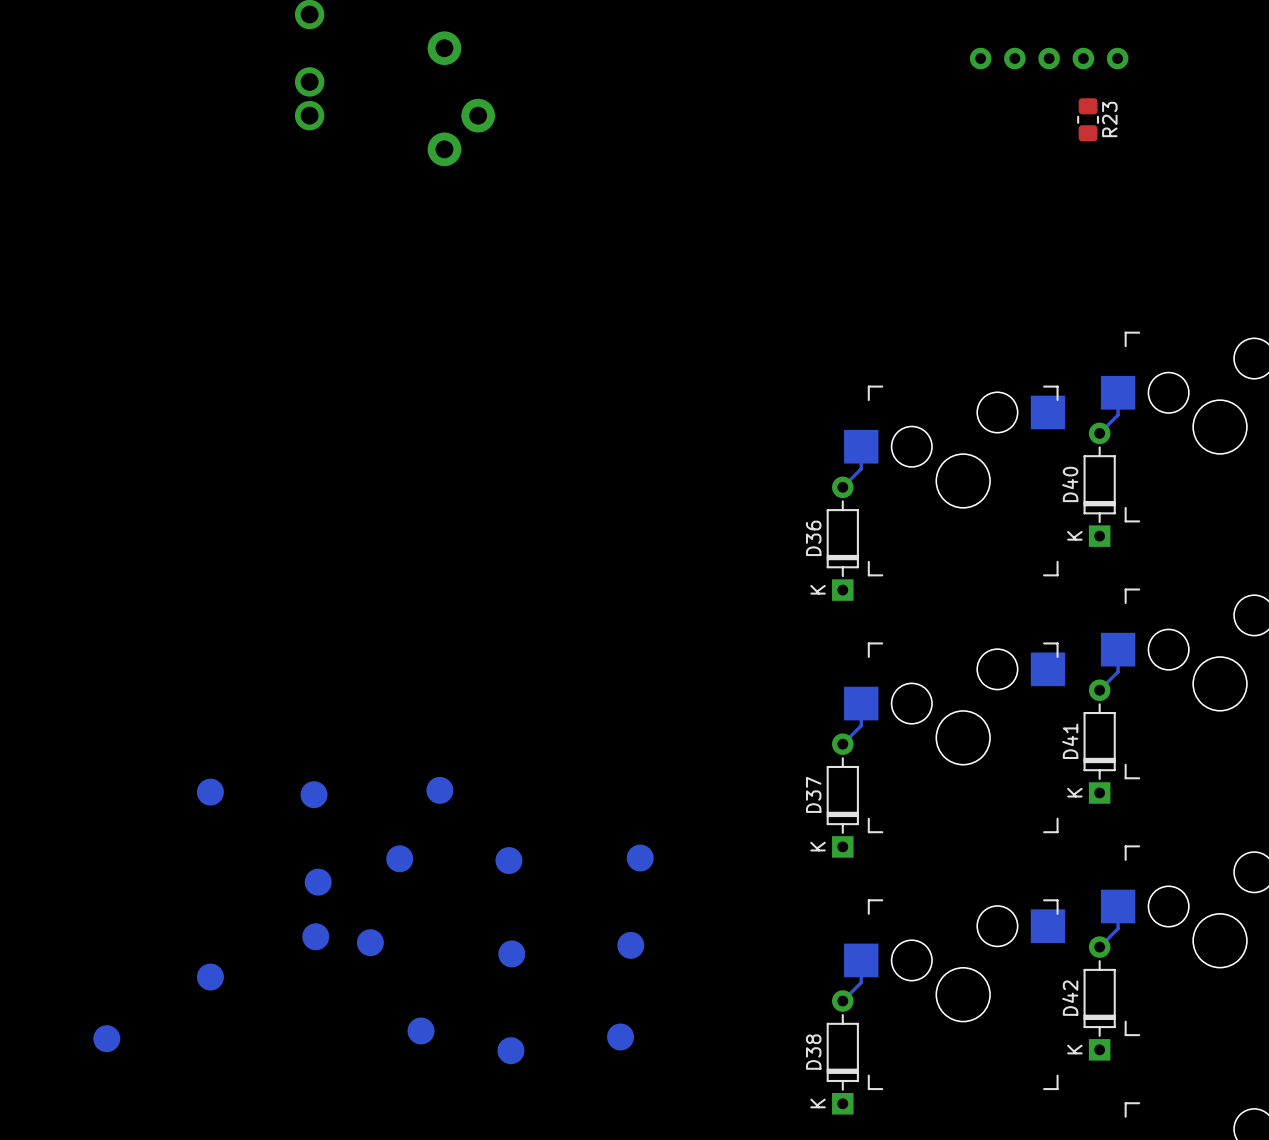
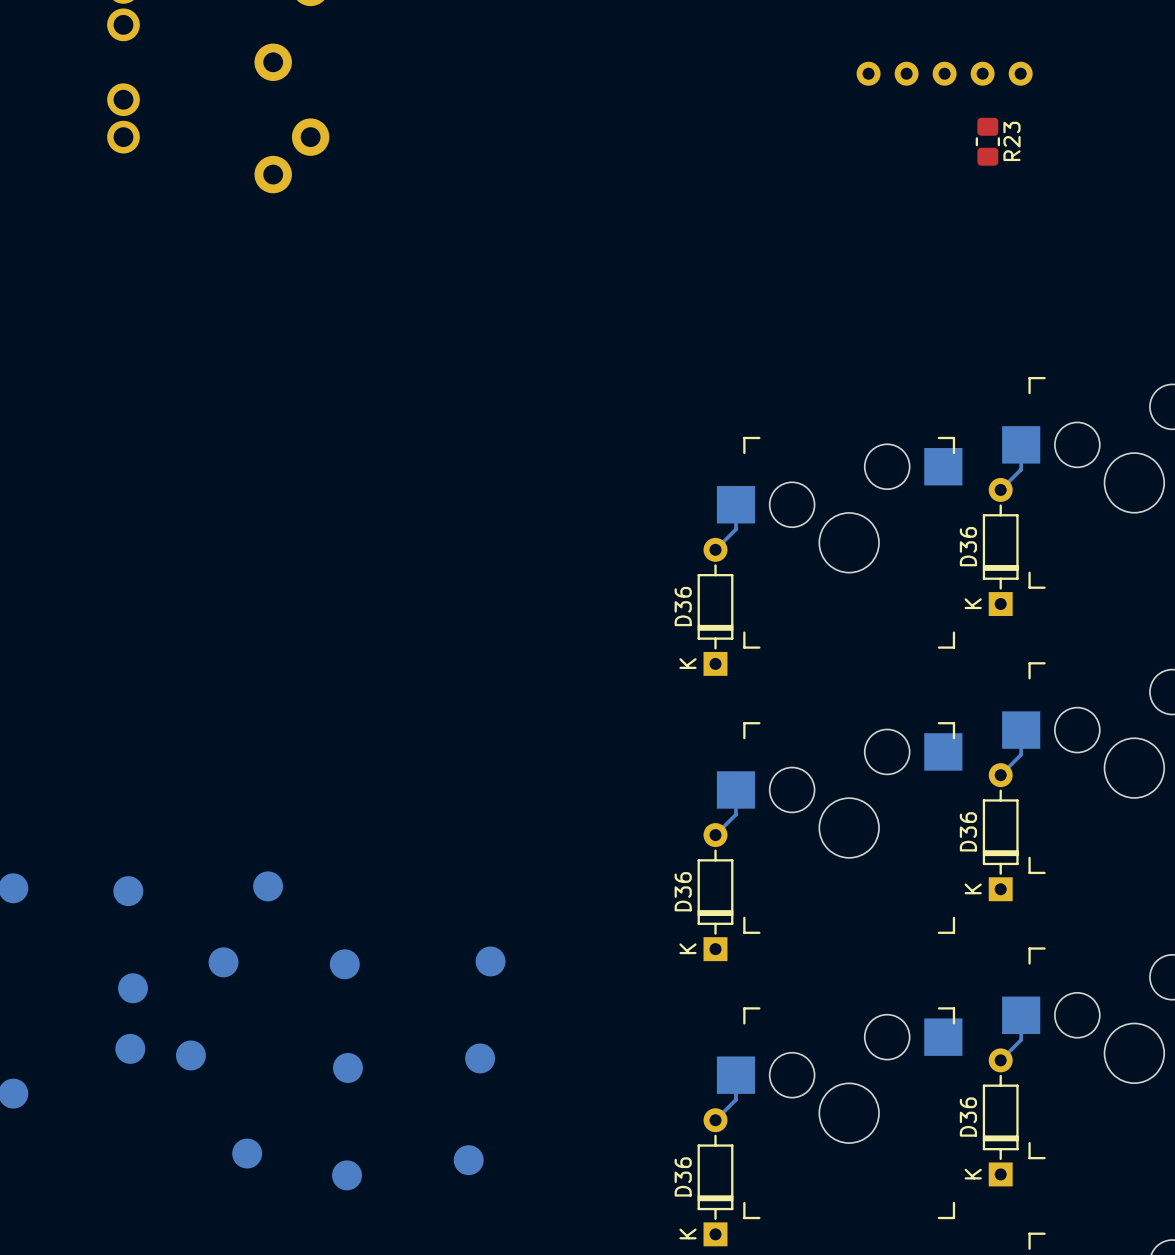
D40 name: D40 (1070, 484) -> D36 (968, 546)
D41 name: D41 (1070, 741) -> D36 (968, 831)
D37 name: D37 (813, 794) -> D36 (683, 891)
D42 name: D42 (1070, 998) -> D36 (968, 1117)
D38 name: D38 (813, 1052) -> D36 (683, 1176)

